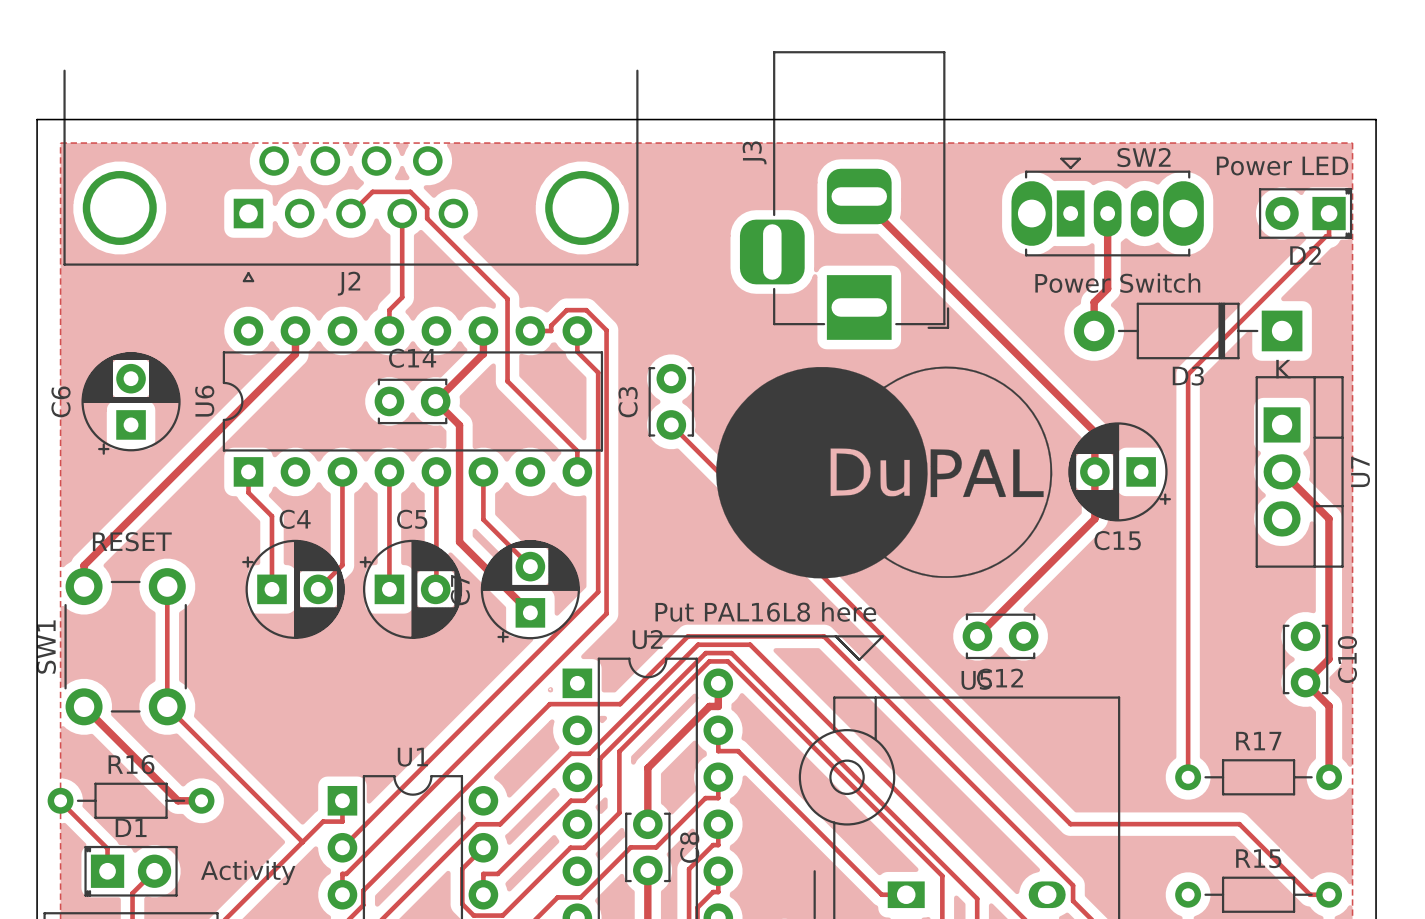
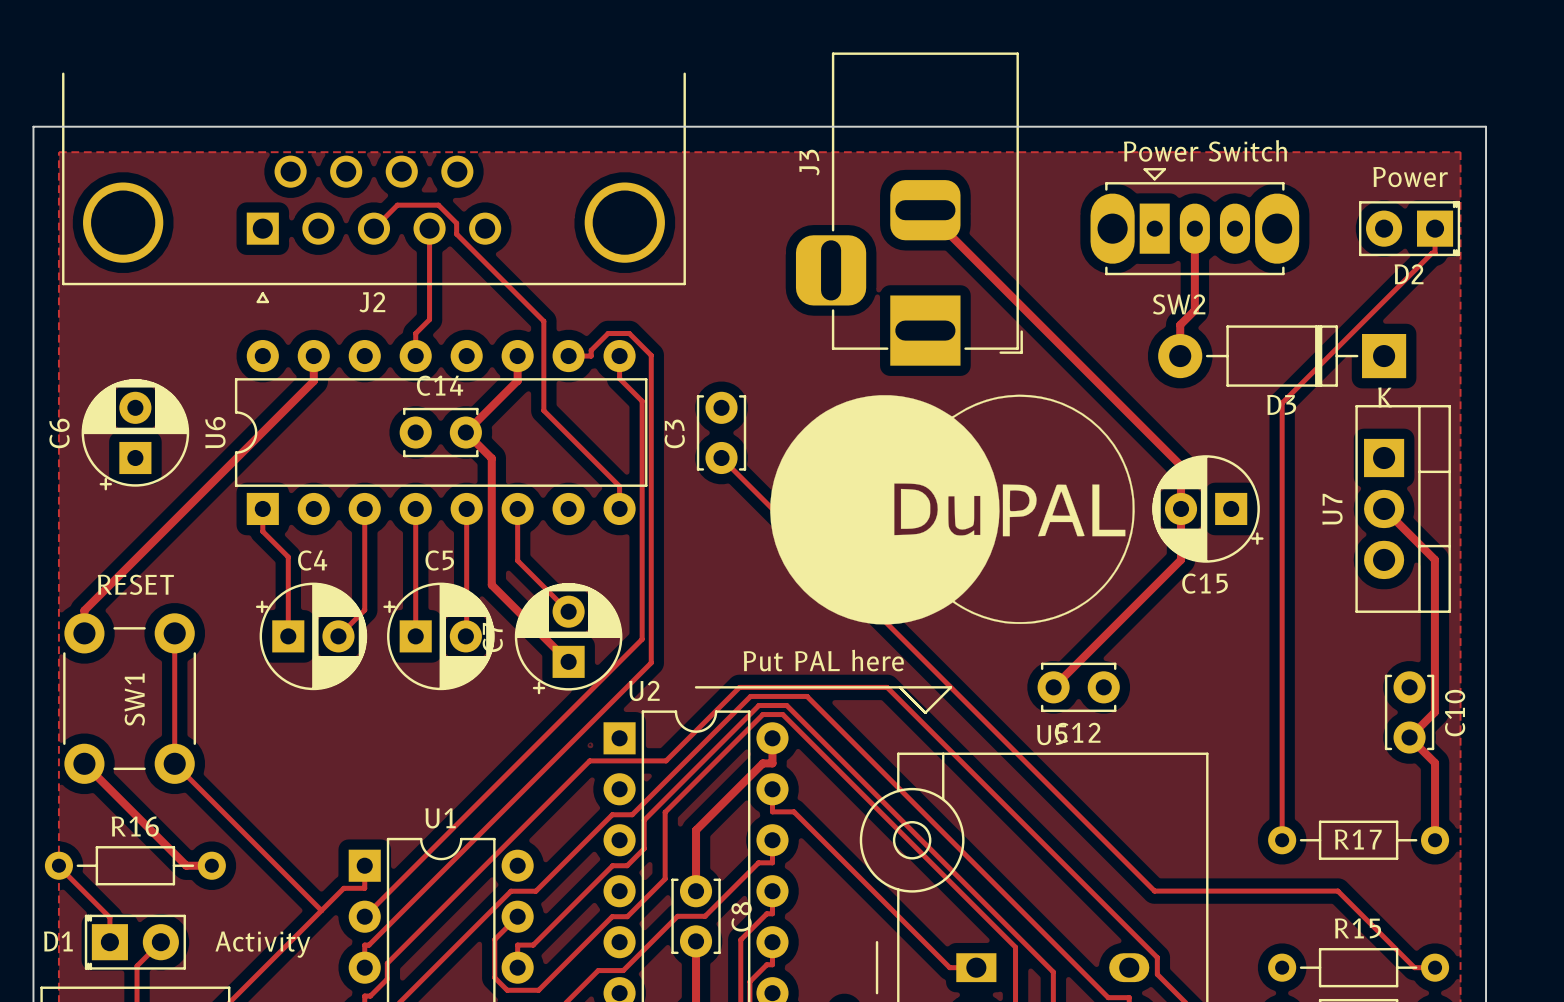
SW2 name position: SW2 (1144, 157) -> SW2 (1179, 304)
text: Power LED (1282, 166) -> Power (1410, 177)
text position: Power Switch (1117, 283) -> Power Switch (1205, 150)
U7 name position: U7 (1360, 471) -> U7 (1332, 509)
text: Put PAL16L8 here (765, 611) -> Put PAL here (823, 660)
U2 name position: U2 (647, 639) -> U2 (644, 690)
SW1 name position: SW1 (46, 647) -> SW1 (134, 699)
R17 name position: R17 (1258, 741) -> R17 (1358, 839)
D1 name position: D1 (131, 827) -> D1 (58, 941)

